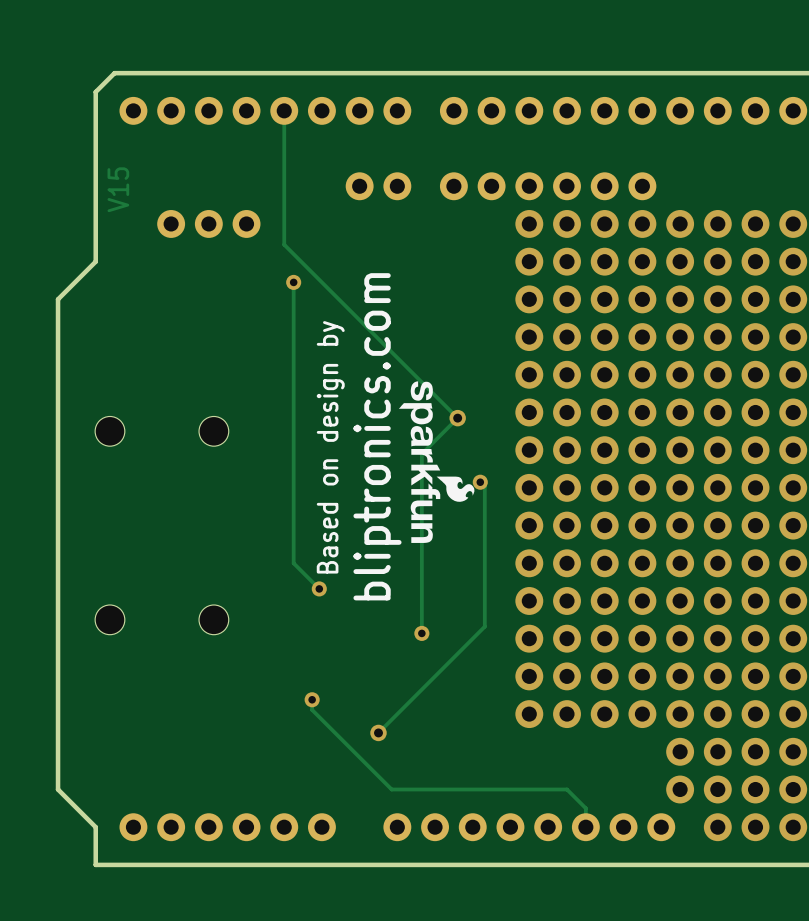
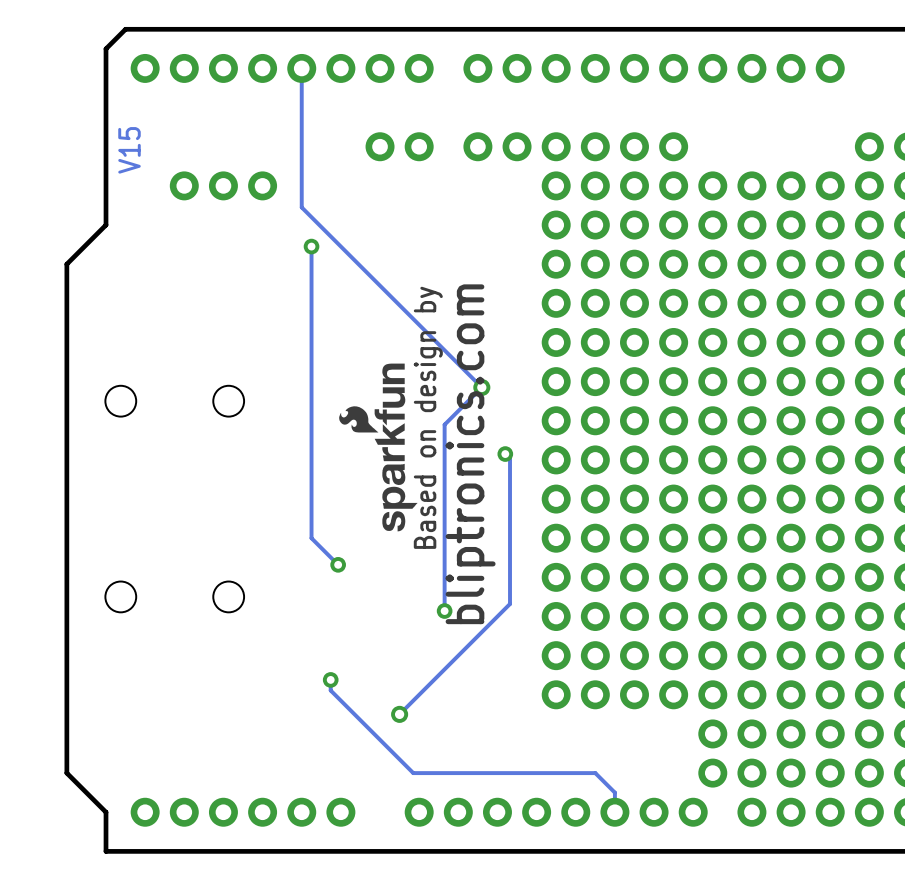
drawing: [398, 381, 475, 543] -> none
drawing: none -> [339, 363, 418, 532]
text: bliptronics.com (377, 436) -> none
text position: Based on design by (330, 447) -> Based on design by (428, 417)
text: none -> bliptronics.com (470, 454)

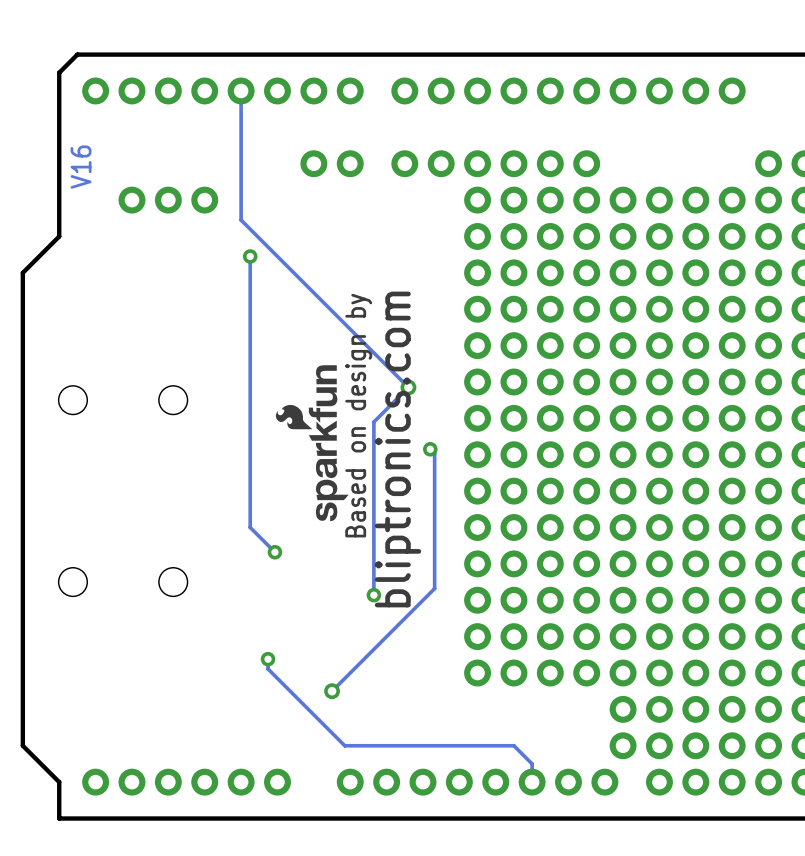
text: V15 (129, 150) -> V16 (81, 167)

